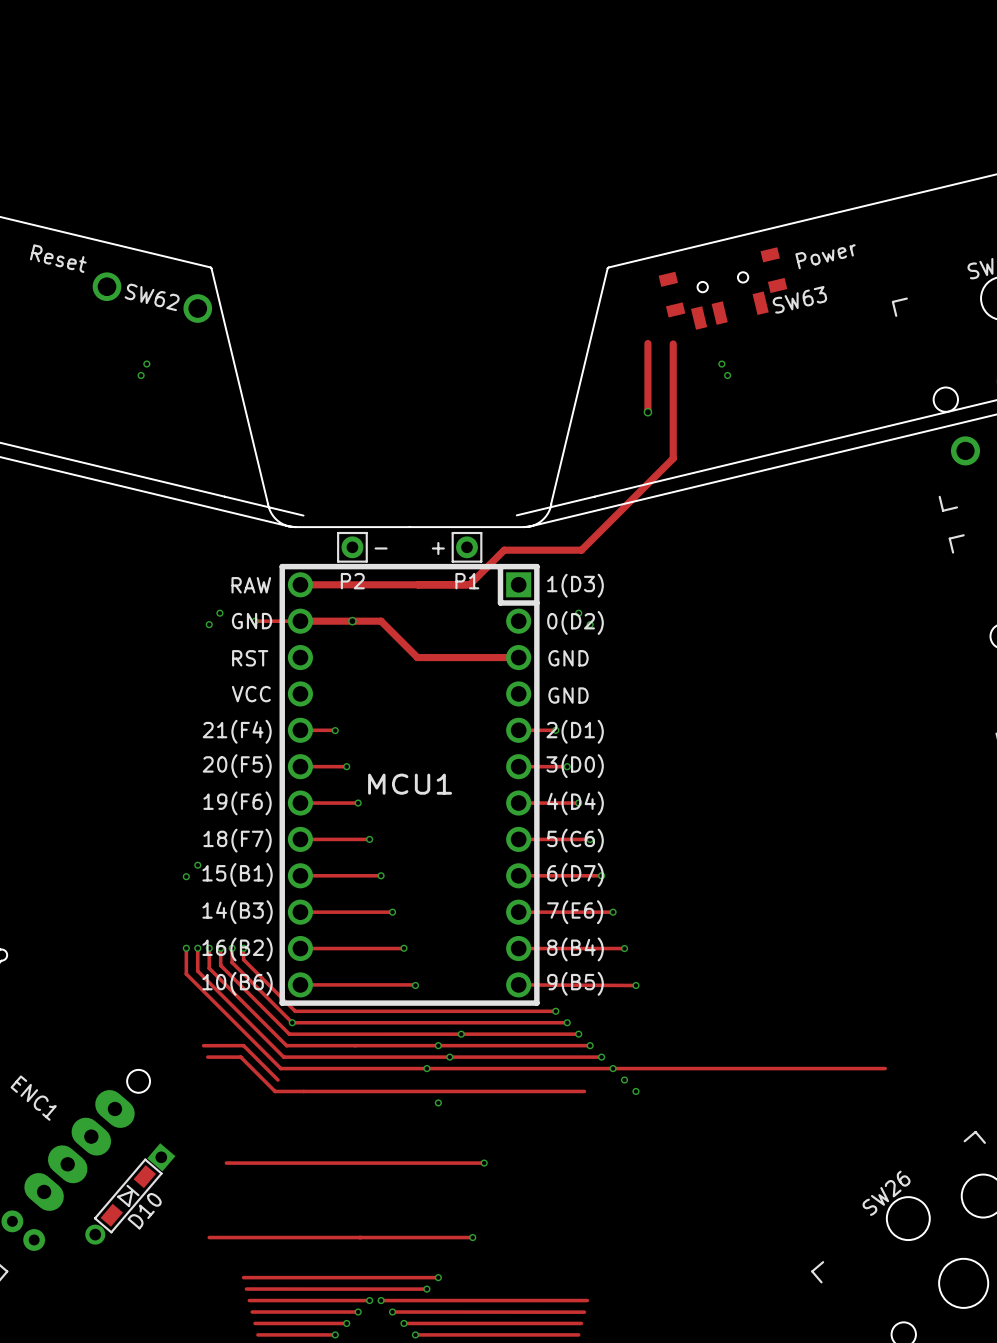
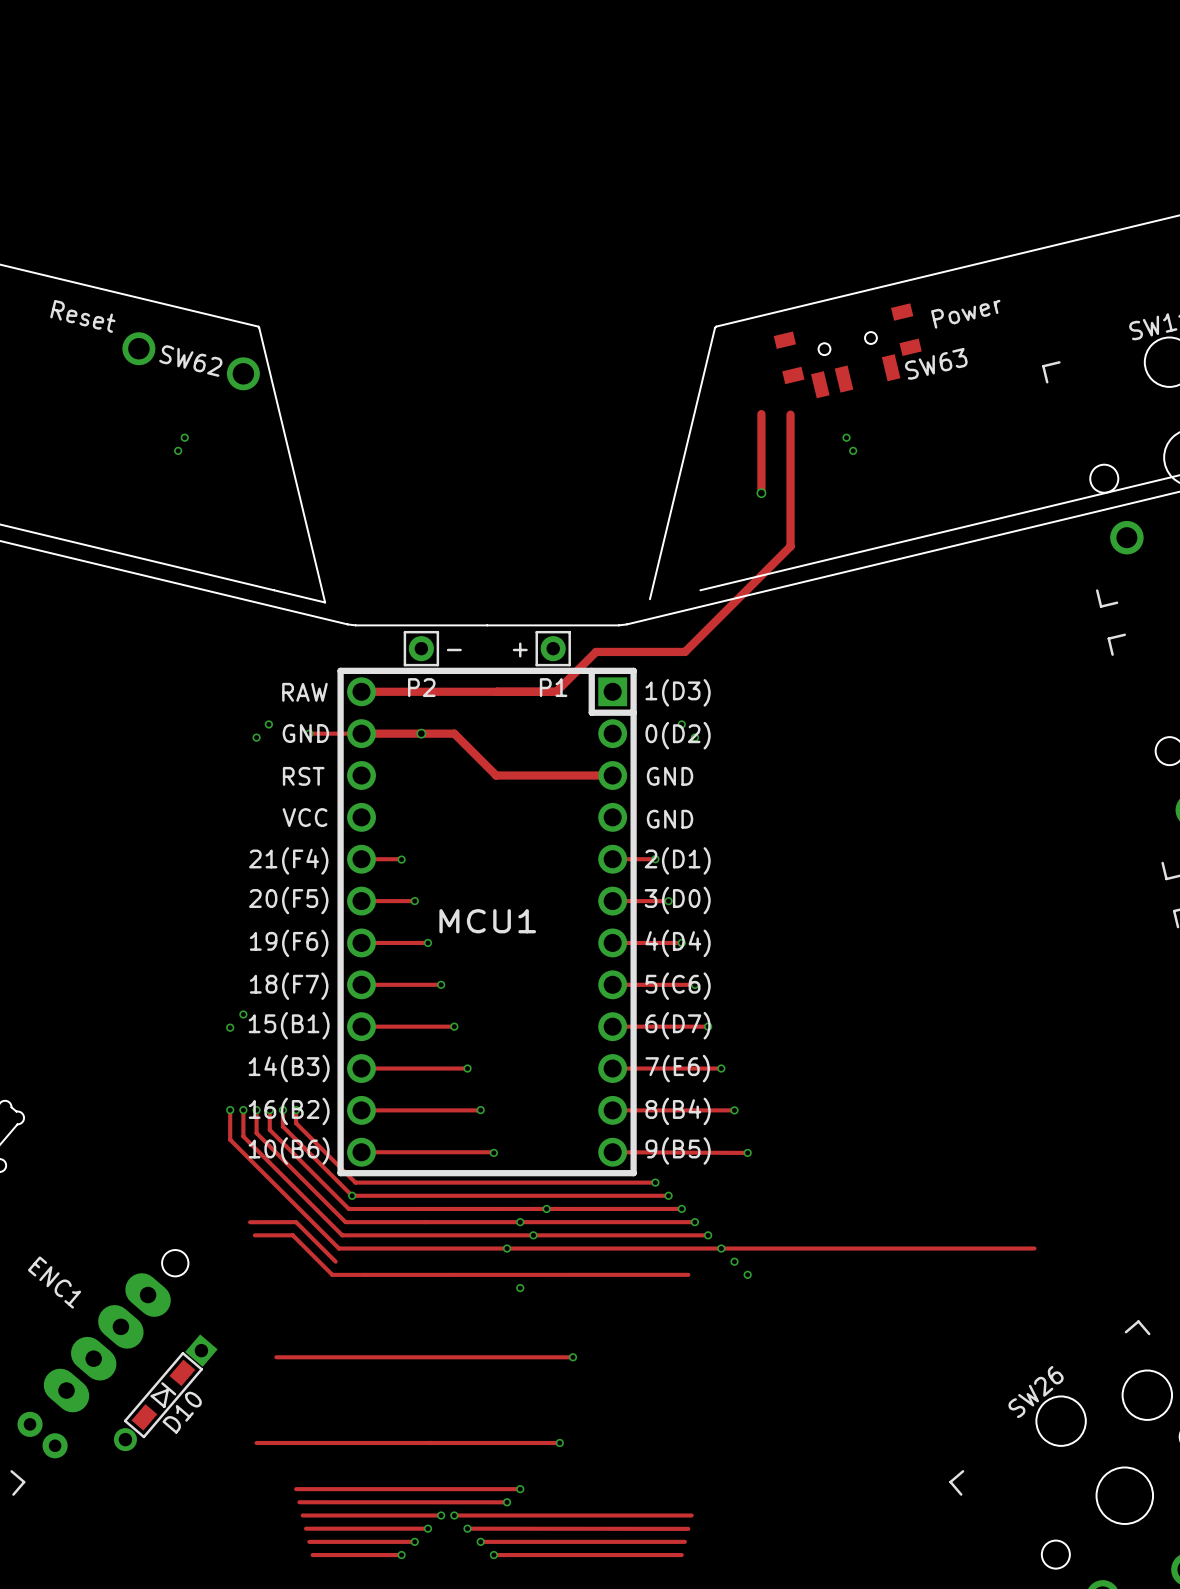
board edge: (211, 268) (268, 507) (277, 520) (285, 525) (295, 527) -> (259, 327) (325, 602) (274, 590)
board edge: (224, 496) (303, 515) -> none
board edge: (594, 496) (516, 515) -> none
board edge: (551, 504) (548, 513) (541, 520) (533, 525) (524, 527) -> none

